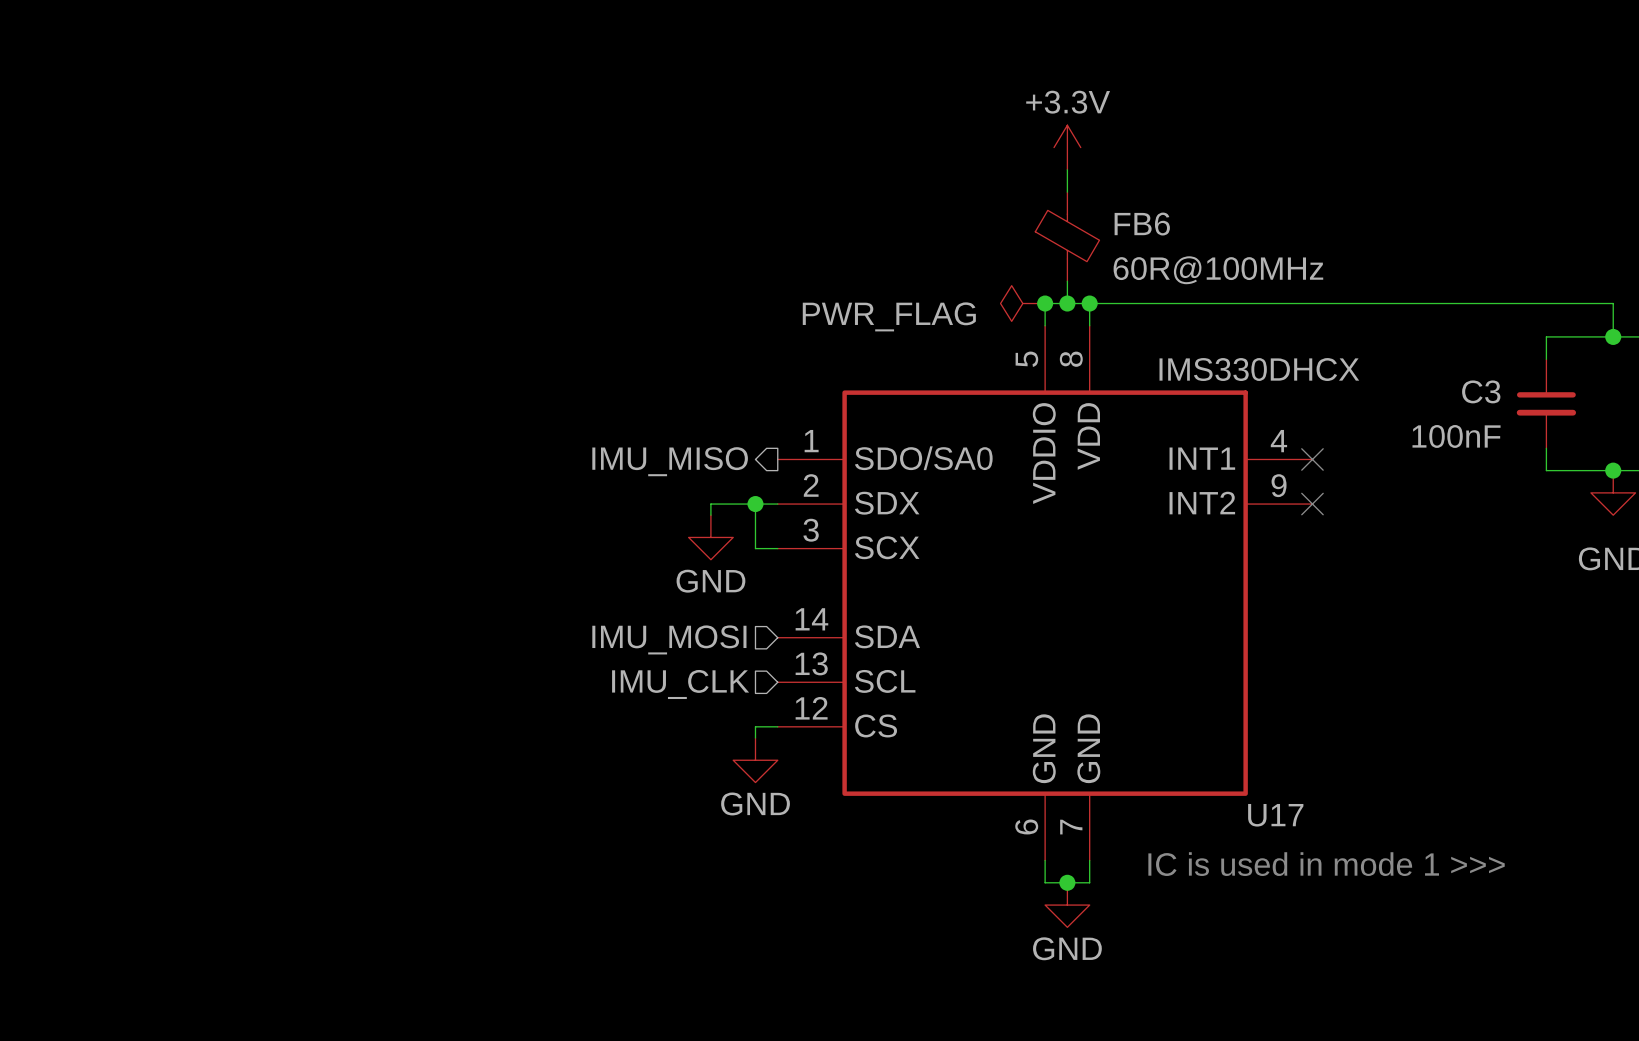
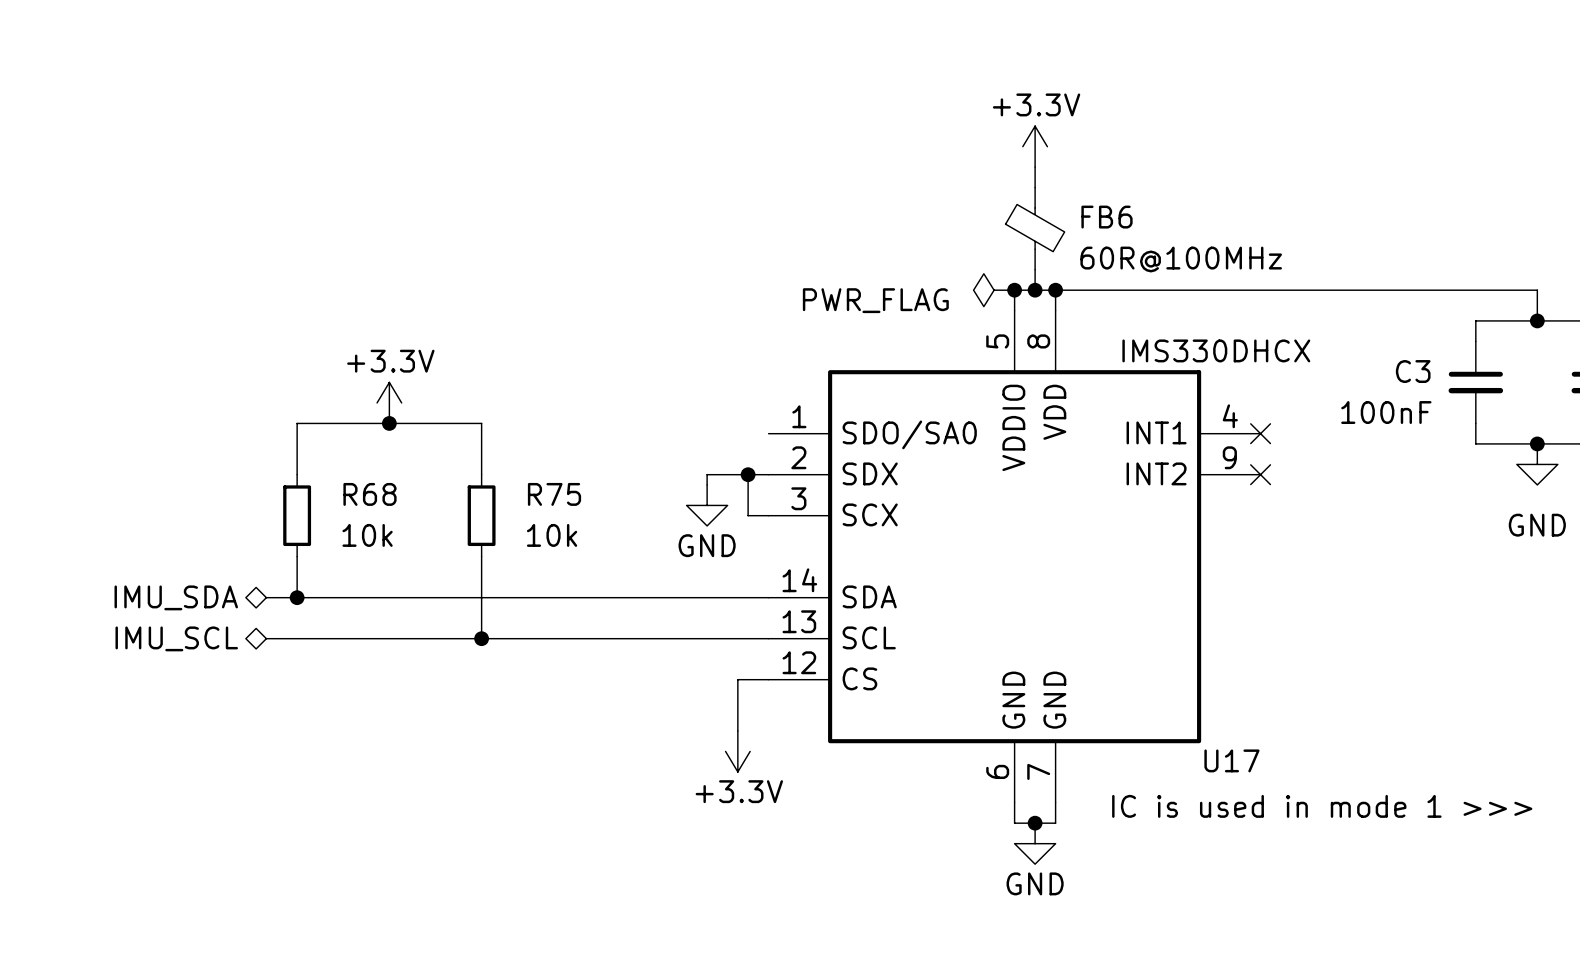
power symbol: none -> +3.3V (389, 402)
junction: none -> (389, 423)
hierarchical label: IMU_MISO (670, 461) -> none
wire: none -> (297, 474) (297, 423) (481, 423) (481, 474)
R68: none -> 10k (297, 515)
R75: none -> 10k (481, 515)
wire: none -> (297, 556) (297, 597)
wire: none -> (481, 556) (481, 638)
wire: none -> (266, 597) (768, 597)
junction: none -> (297, 597)
hierarchical label: none -> IMU_SDA (176, 597)
hierarchical label: IMU_MOSI (669, 639) -> none
wire: none -> (266, 638) (768, 638)
junction: none -> (481, 638)
hierarchical label: none -> IMU_SCL (176, 638)
hierarchical label: IMU_CLK (680, 684) -> none
wire: (755, 726) (755, 737) -> (748, 679) (737, 679) (737, 730)
power symbol: GND (755, 760) -> none
power symbol: none -> +3.3V (737, 751)

